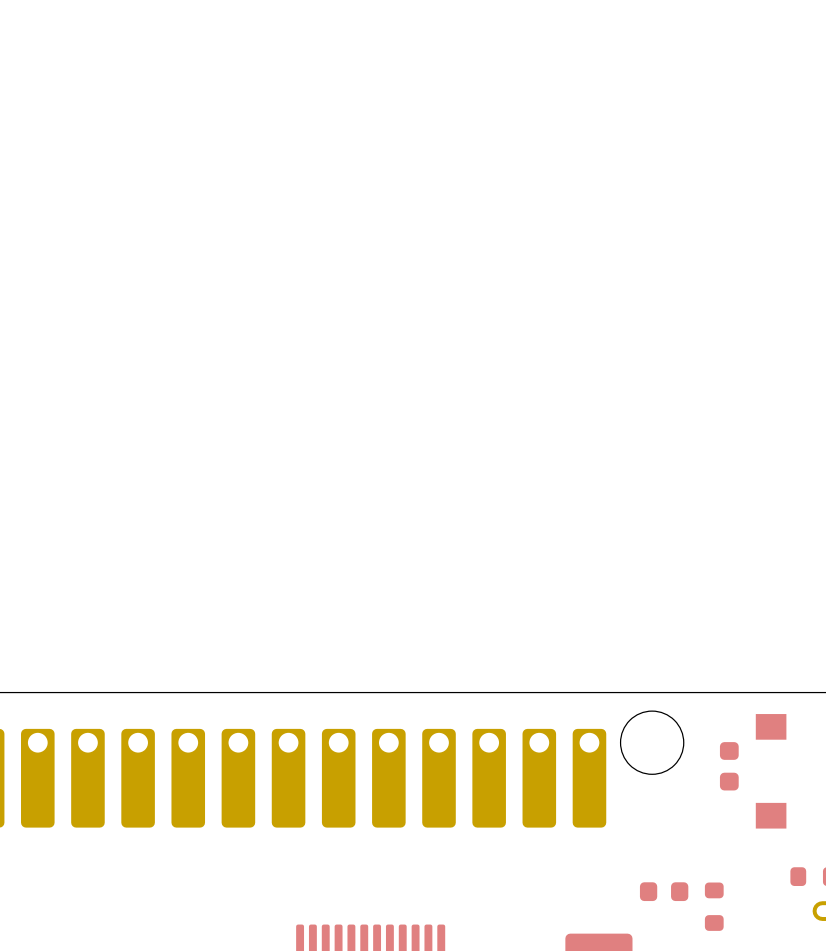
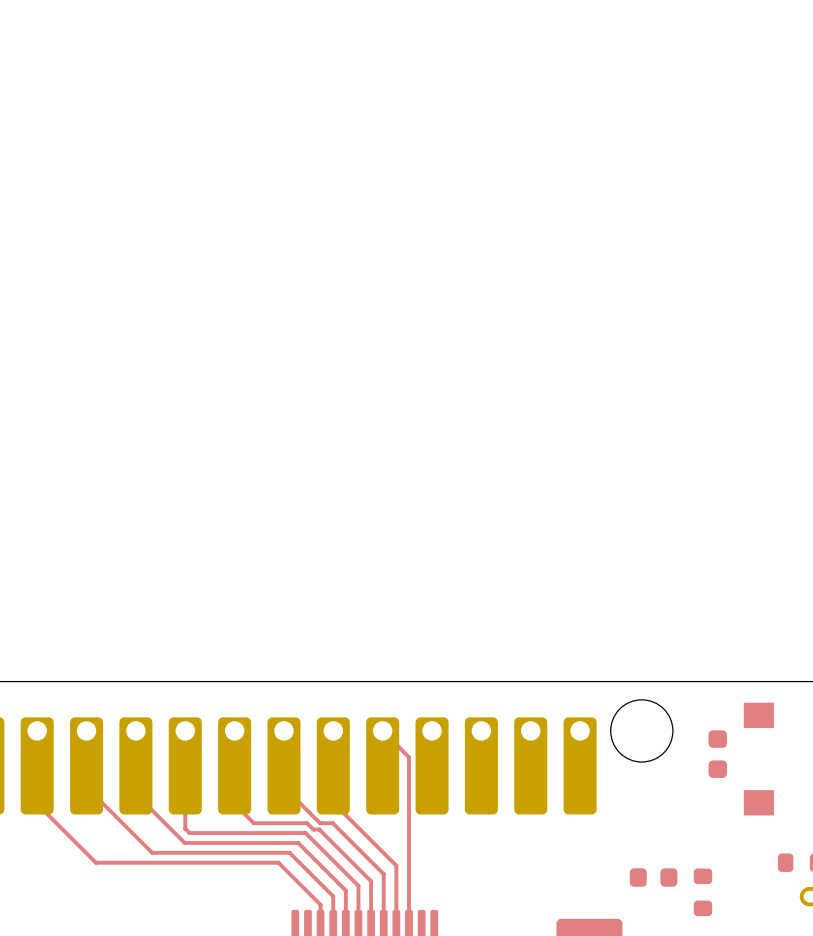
top track: none -> (37, 730) (37, 804) (95, 862) (278, 862) (320, 904) (320, 924)
top track: none -> (86, 730) (86, 787) (152, 852) (289, 852) (333, 896) (333, 924)
top track: none -> (135, 730) (135, 794) (184, 842) (298, 842) (345, 890) (345, 924)
top track: none -> (185, 730) (185, 828) (189, 833) (305, 833) (358, 885) (358, 924)
top track: none -> (234, 730) (234, 804) (253, 823) (307, 823) (313, 829) (319, 829) (371, 881) (371, 924)
top track: none -> (283, 730) (283, 787) (320, 823) (332, 823) (383, 874) (383, 924)
top track: none -> (333, 730) (333, 802) (396, 865) (396, 924)
top track: none -> (382, 730) (408, 757) (408, 924)

